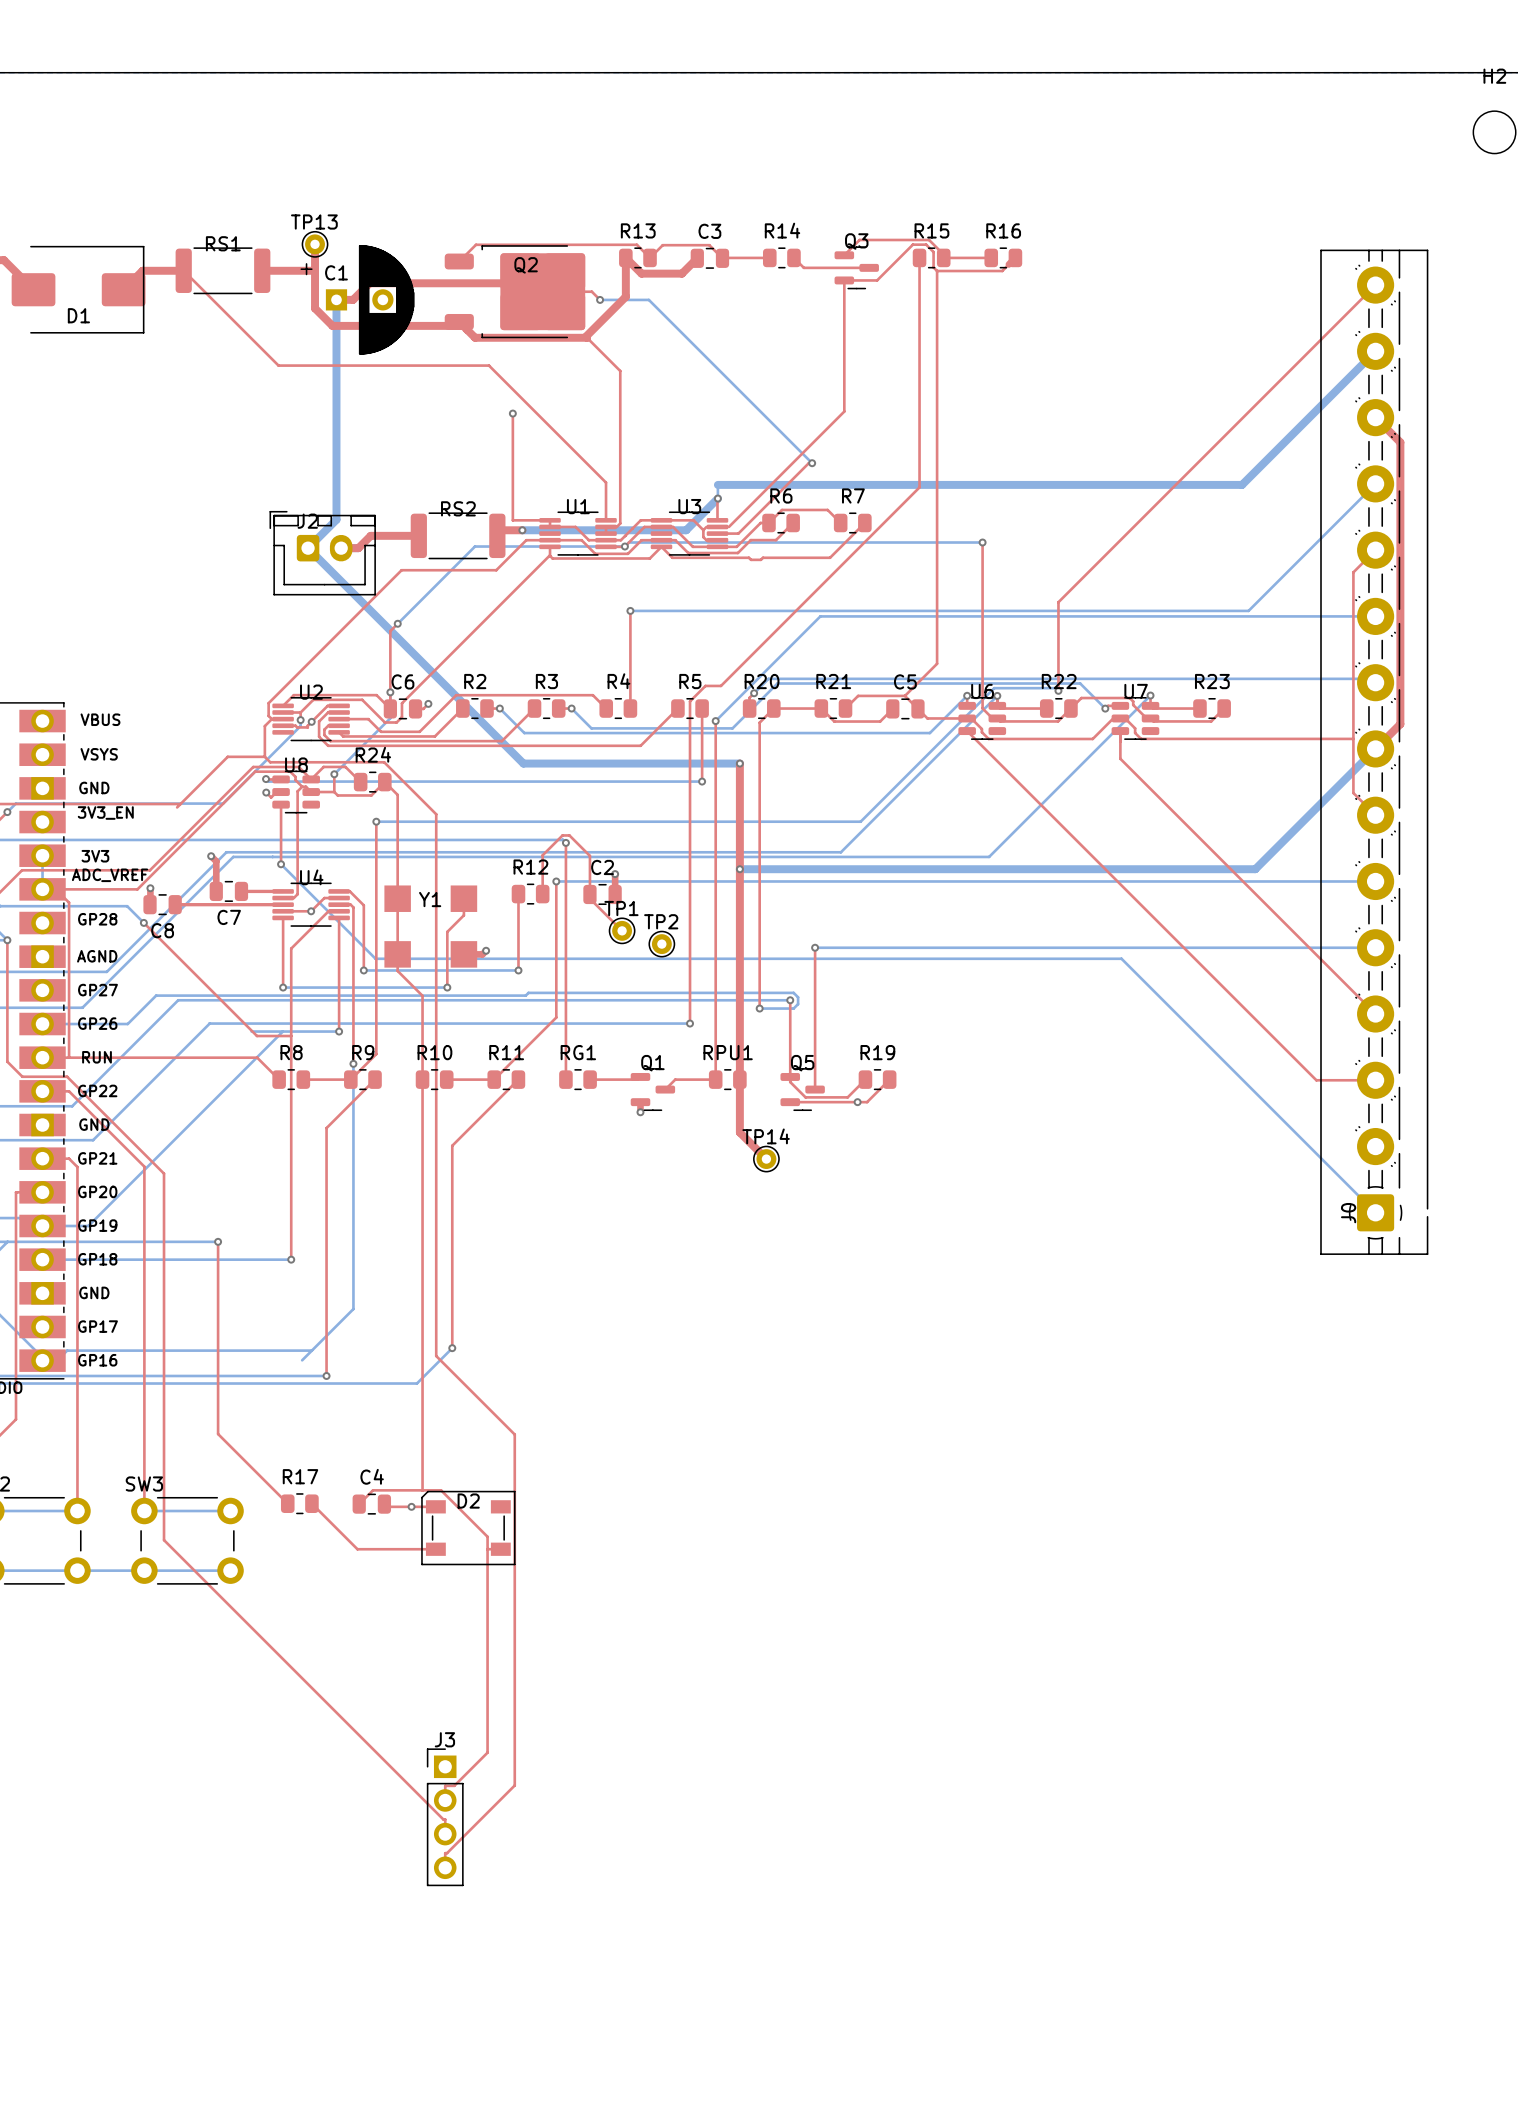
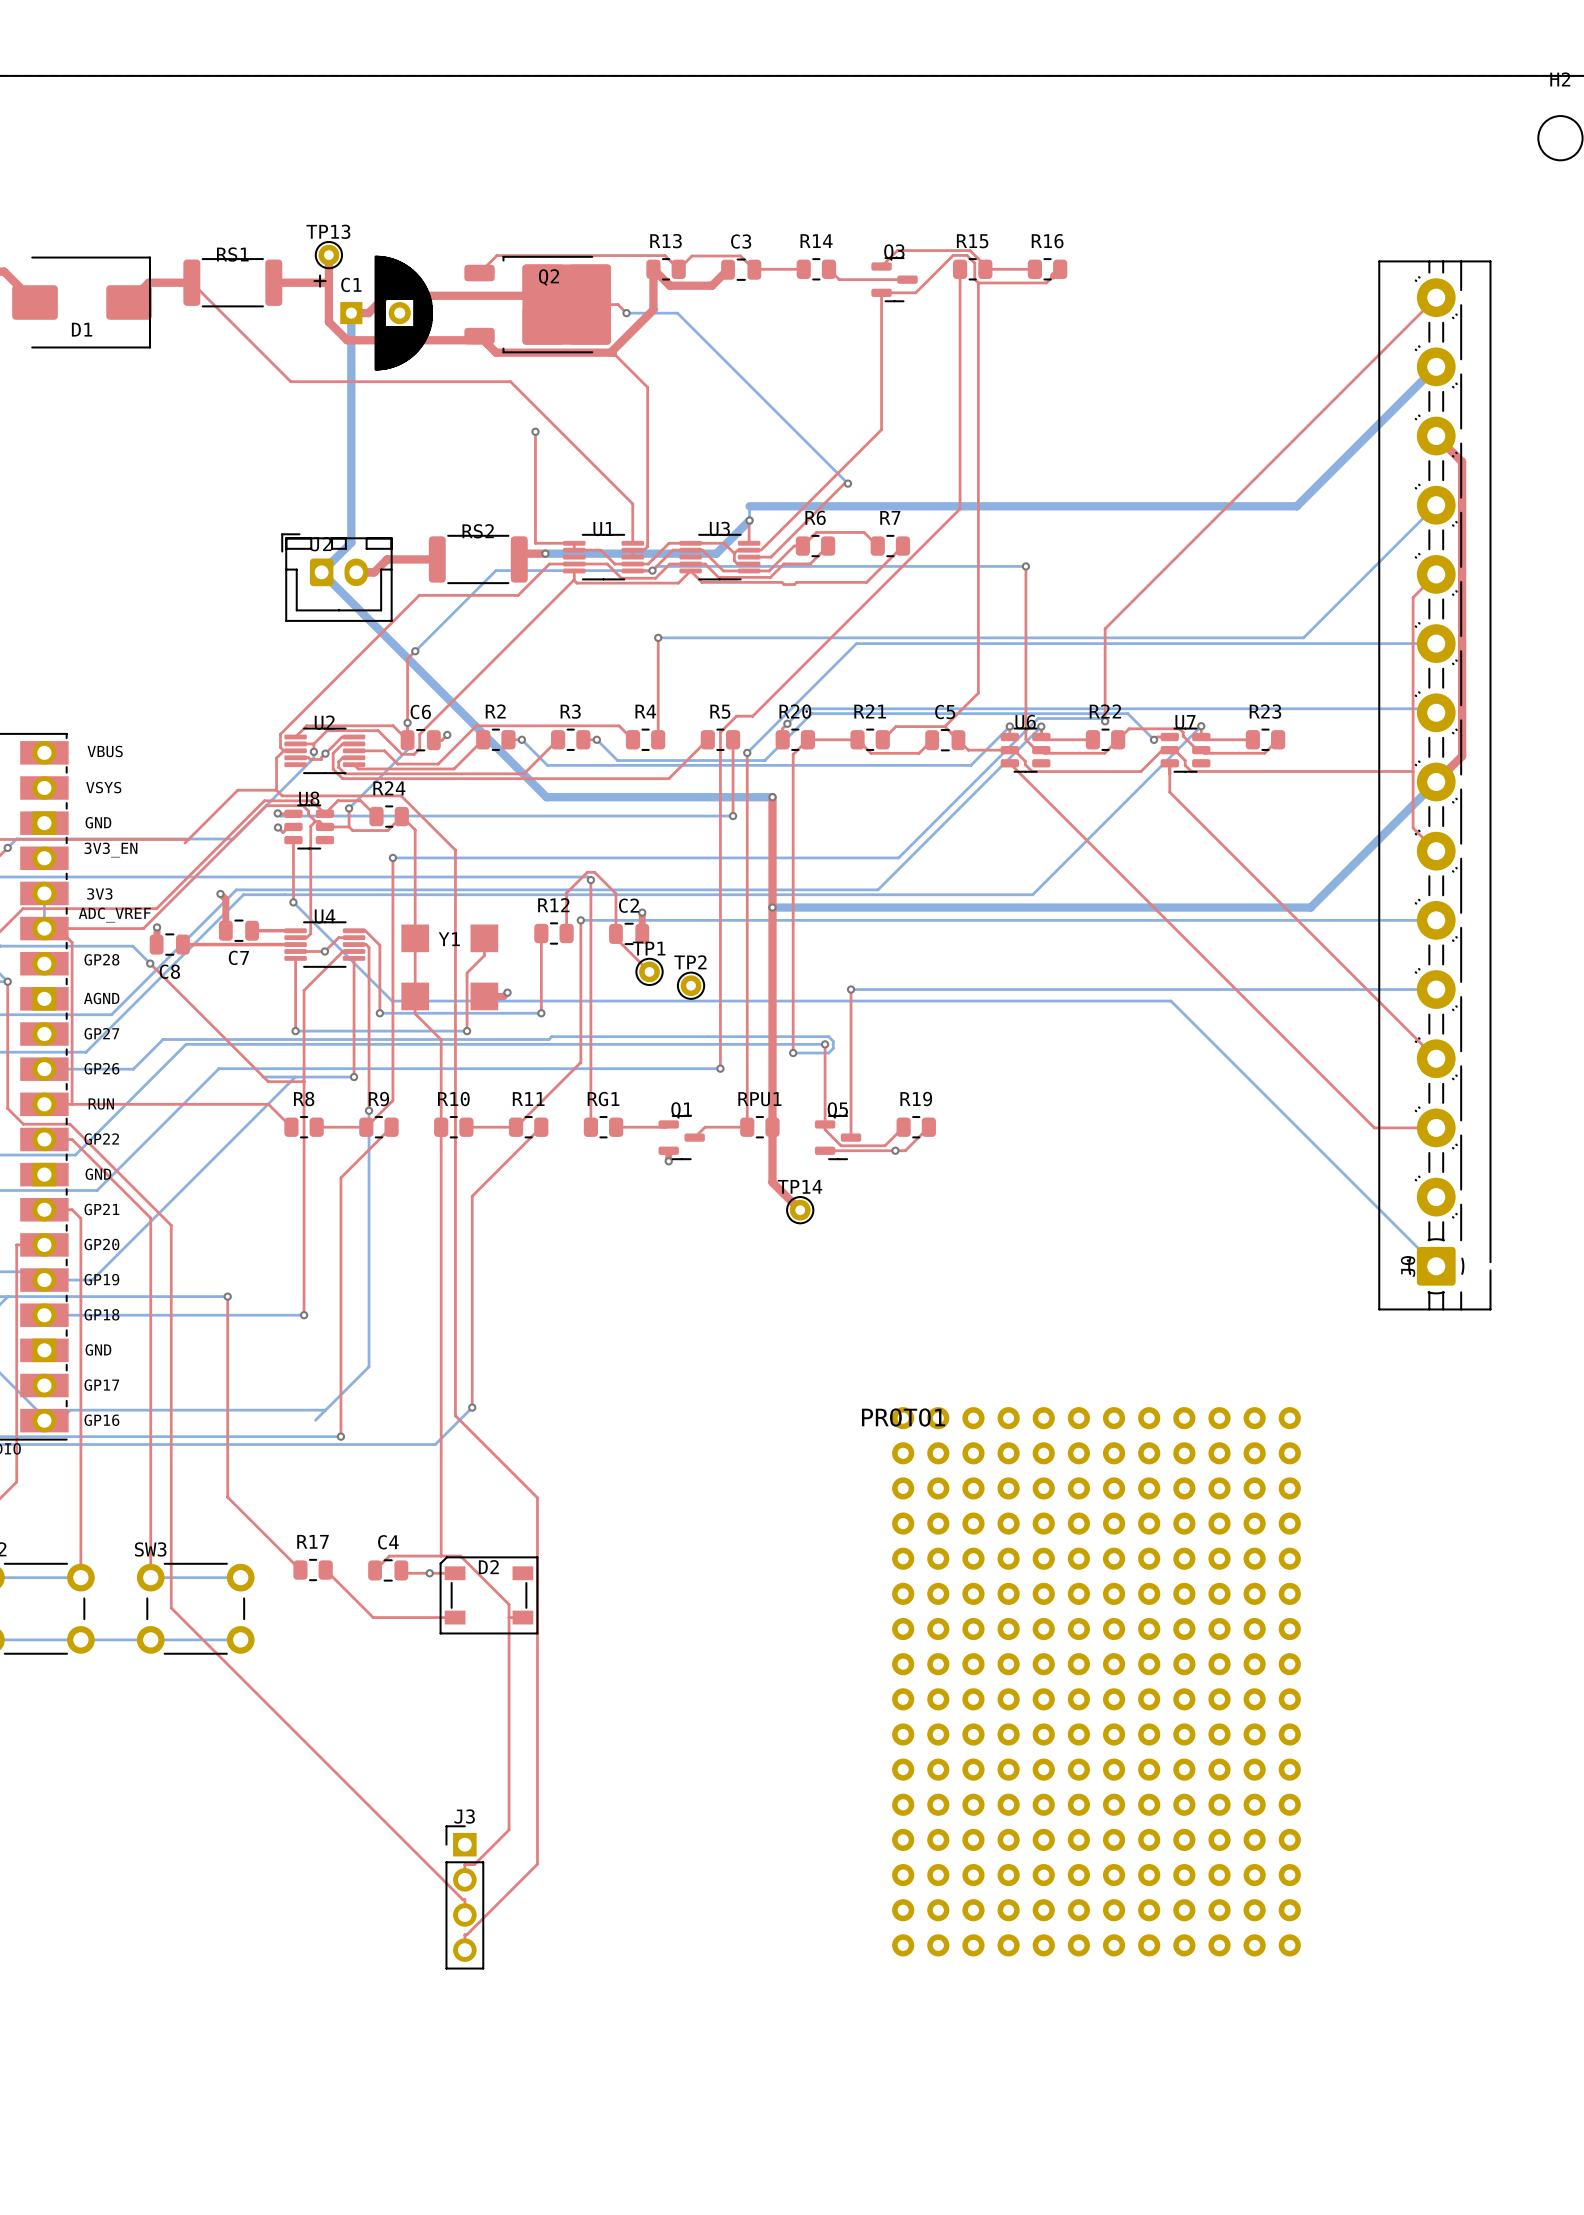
PROTO1: none -> (1096, 1681)

